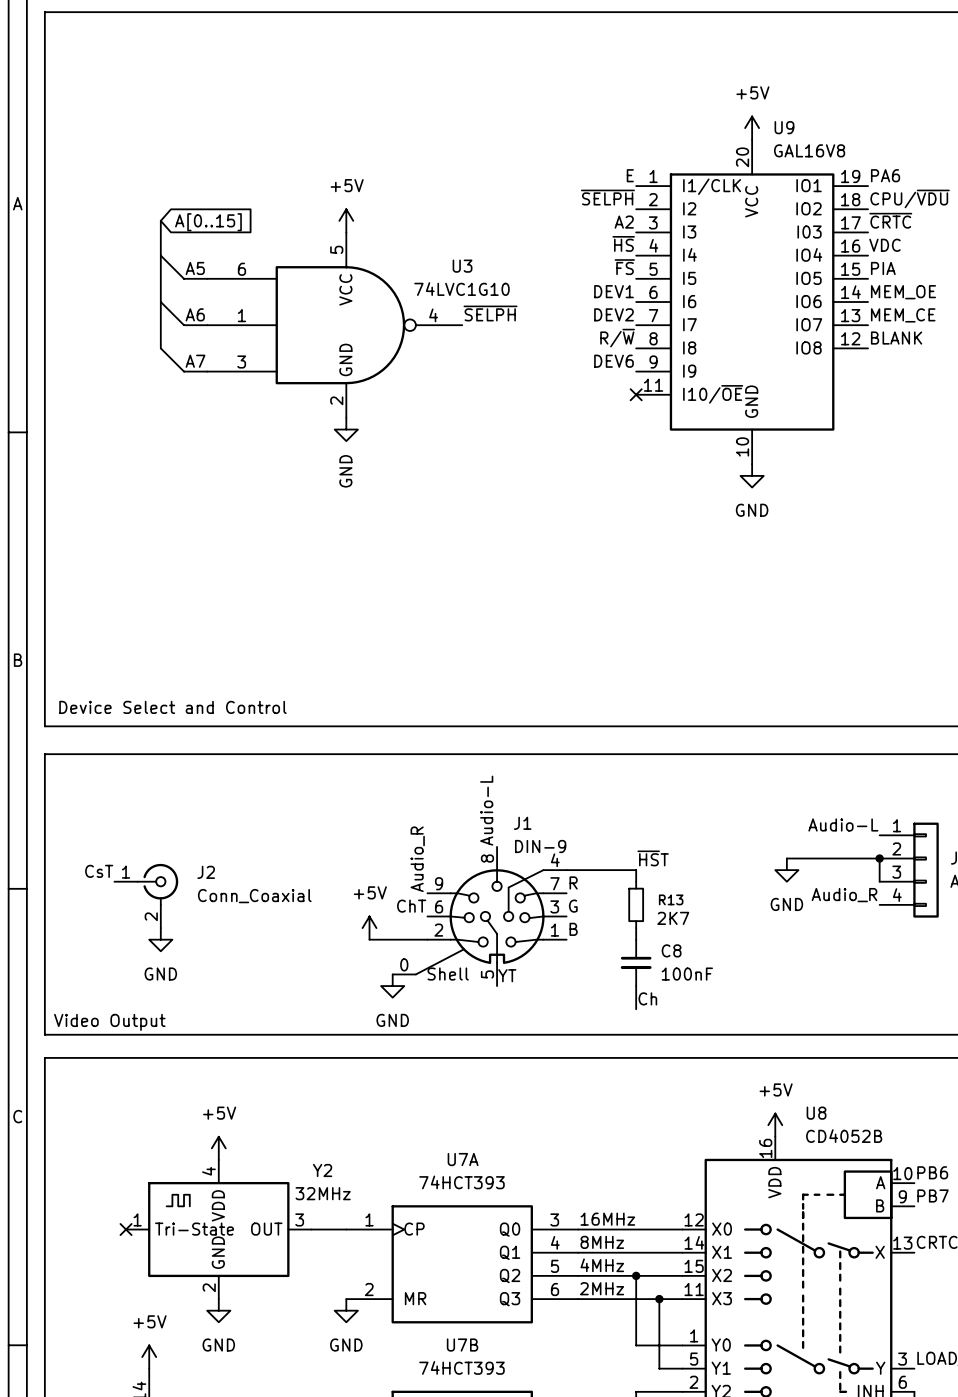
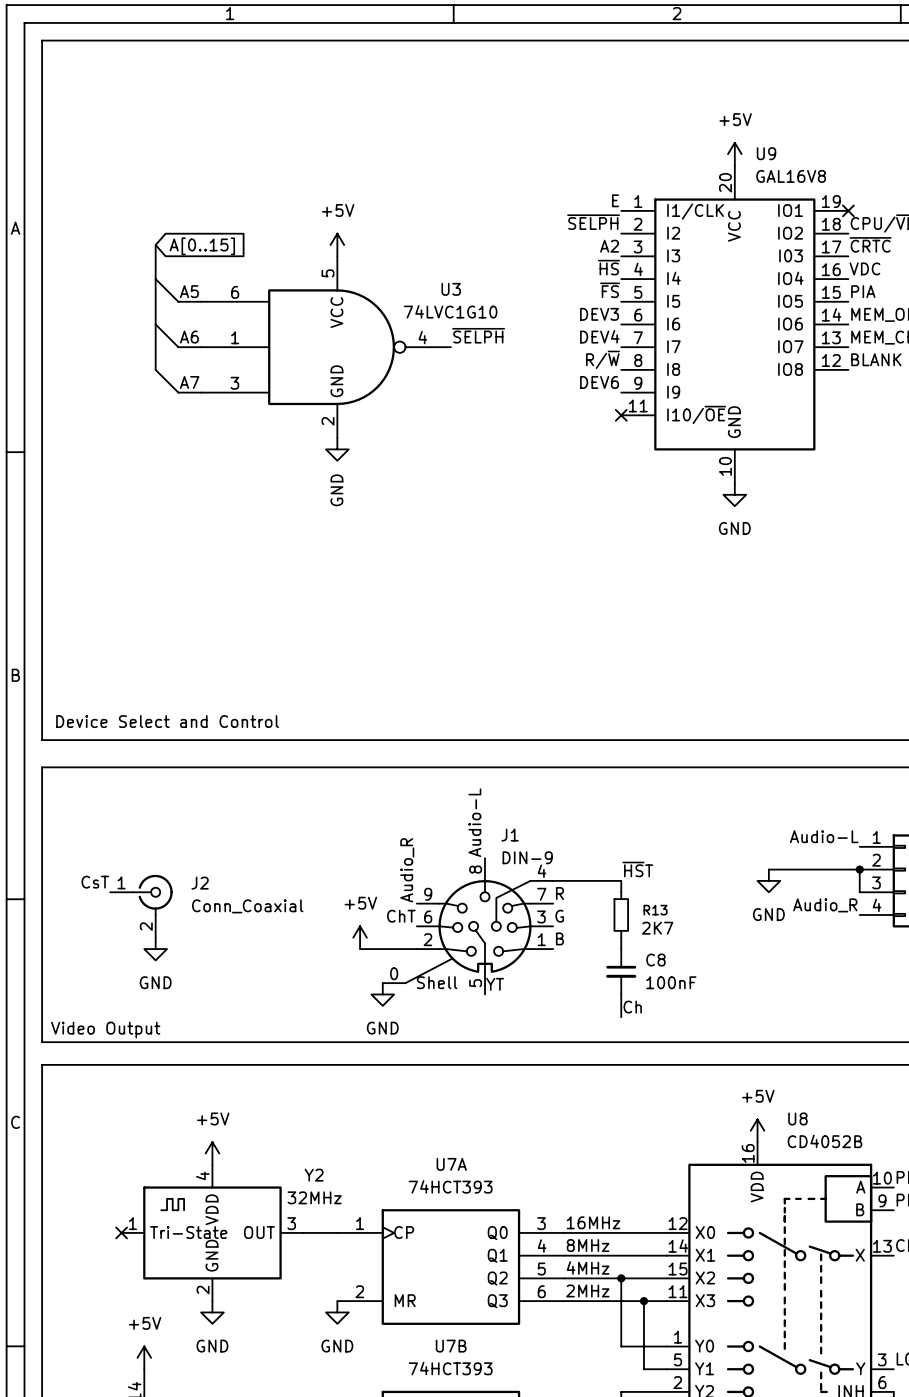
label: PA6 (885, 175) -> none
no-connect mark: none -> (848, 210)
label: DEV1 (614, 291) -> DEV3 (599, 314)
label: DEV2 (614, 314) -> DEV4 (599, 336)

